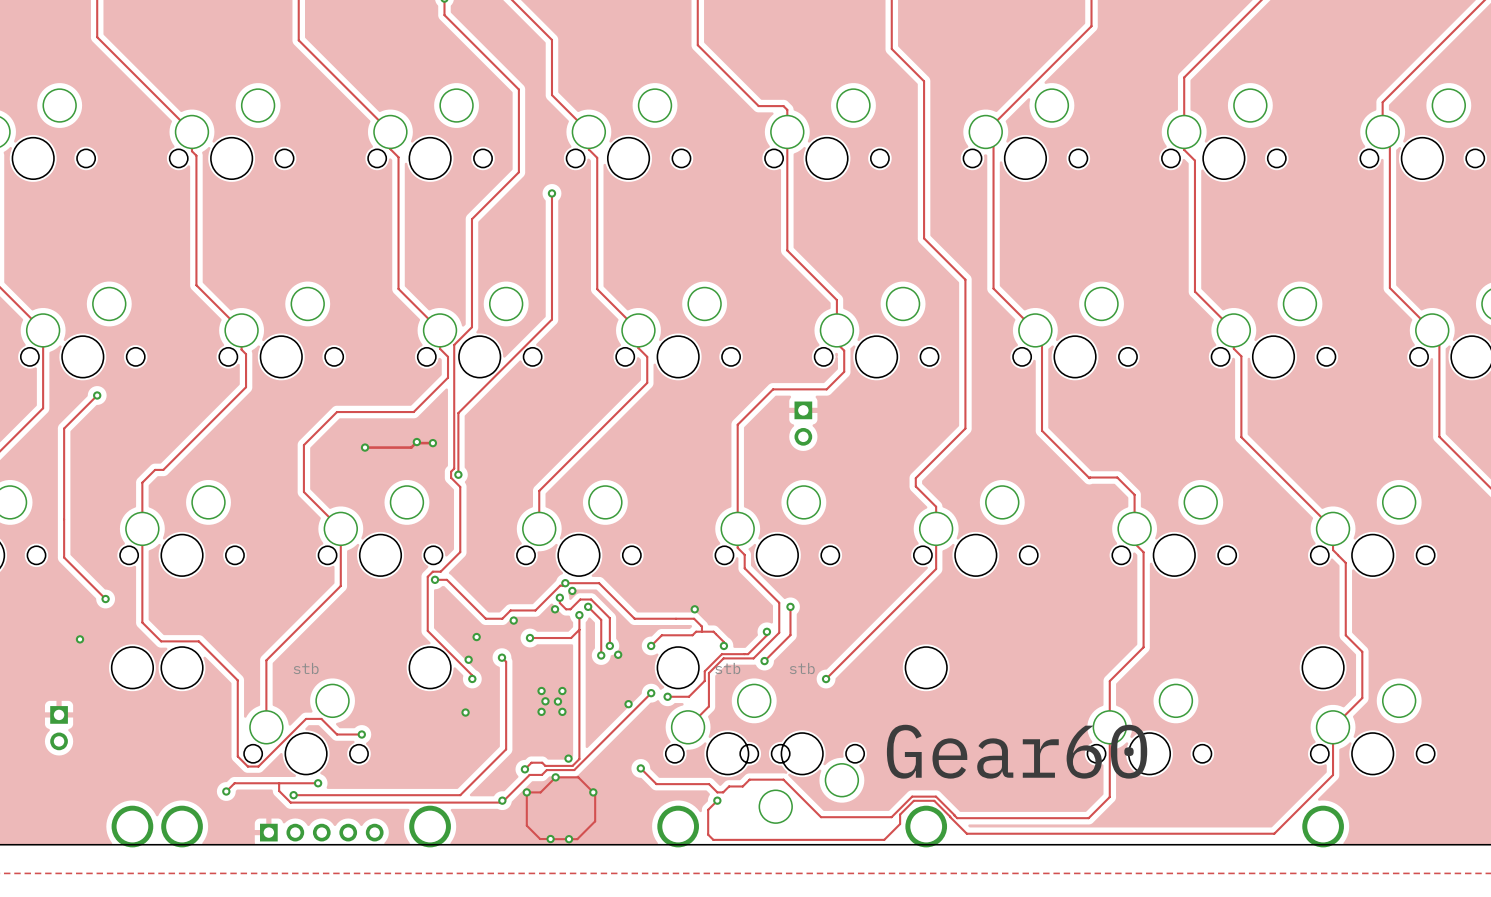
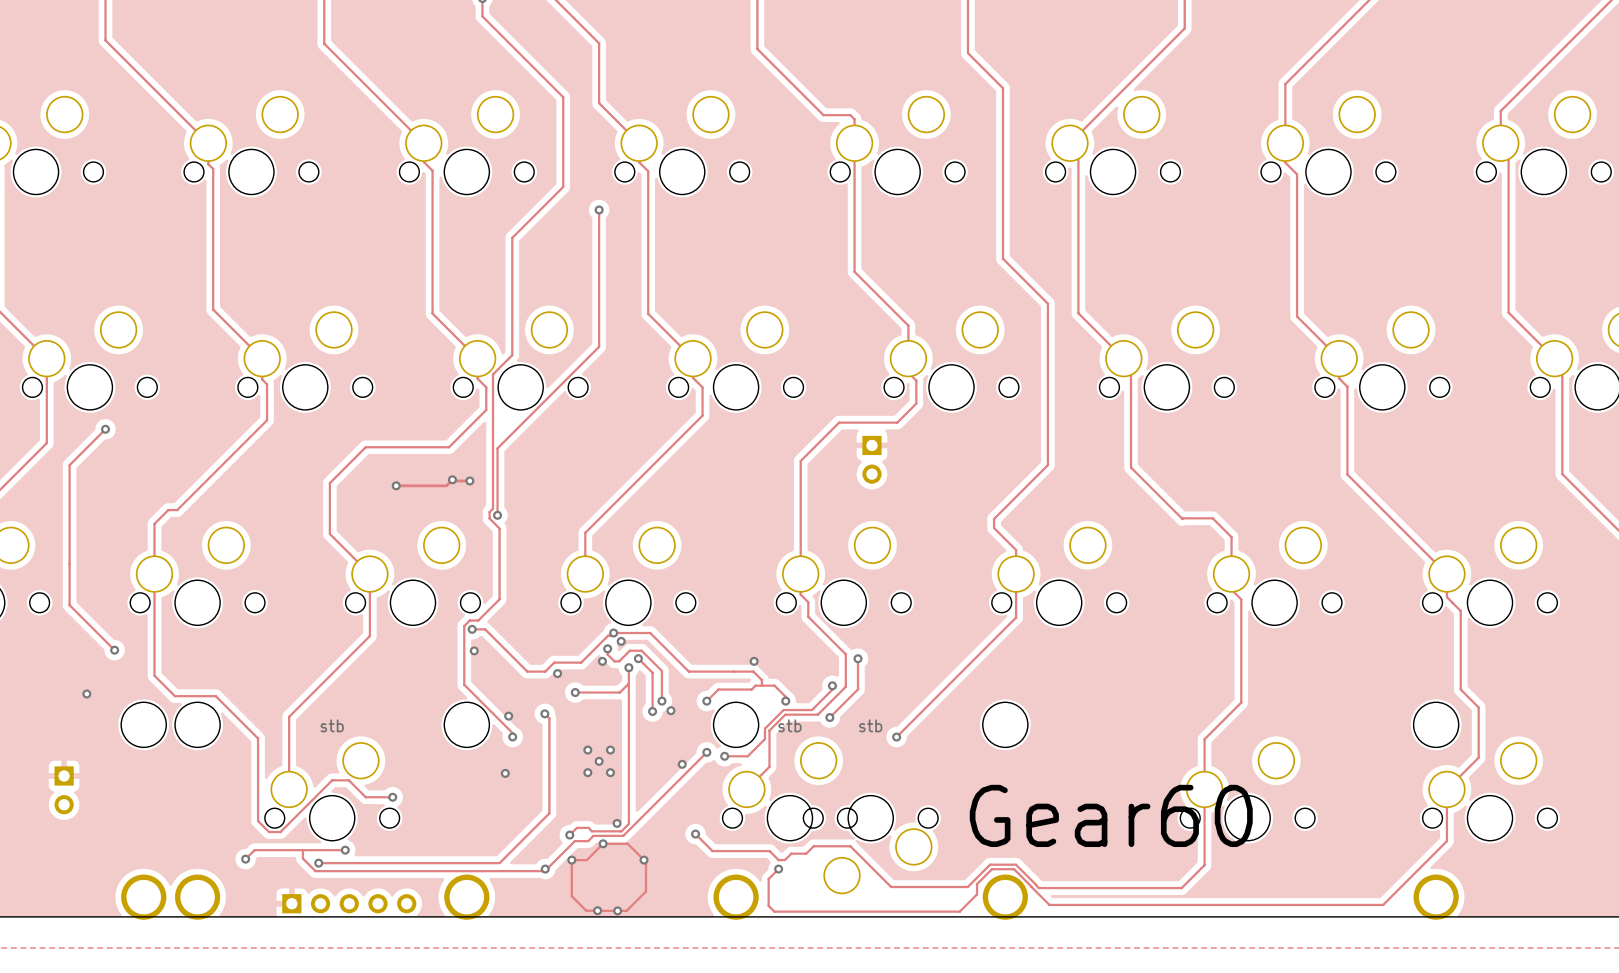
via: none -> (474, 650)
via: (476, 637) -> none
via: (545, 701) -> none
via: none -> (599, 761)
via: (557, 701) -> none

